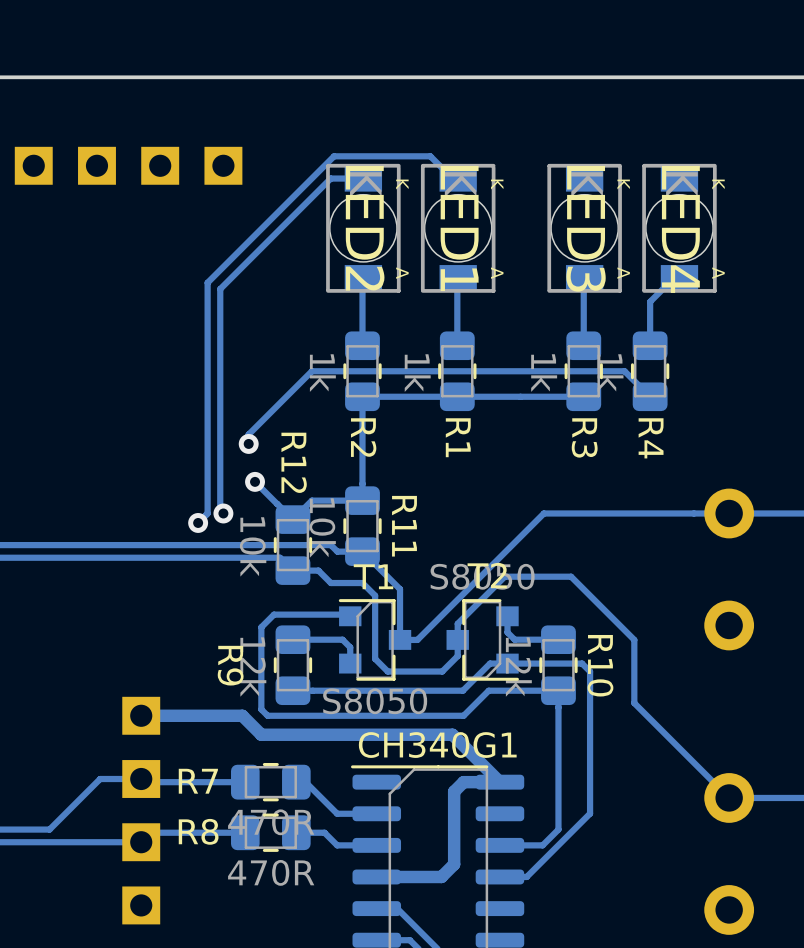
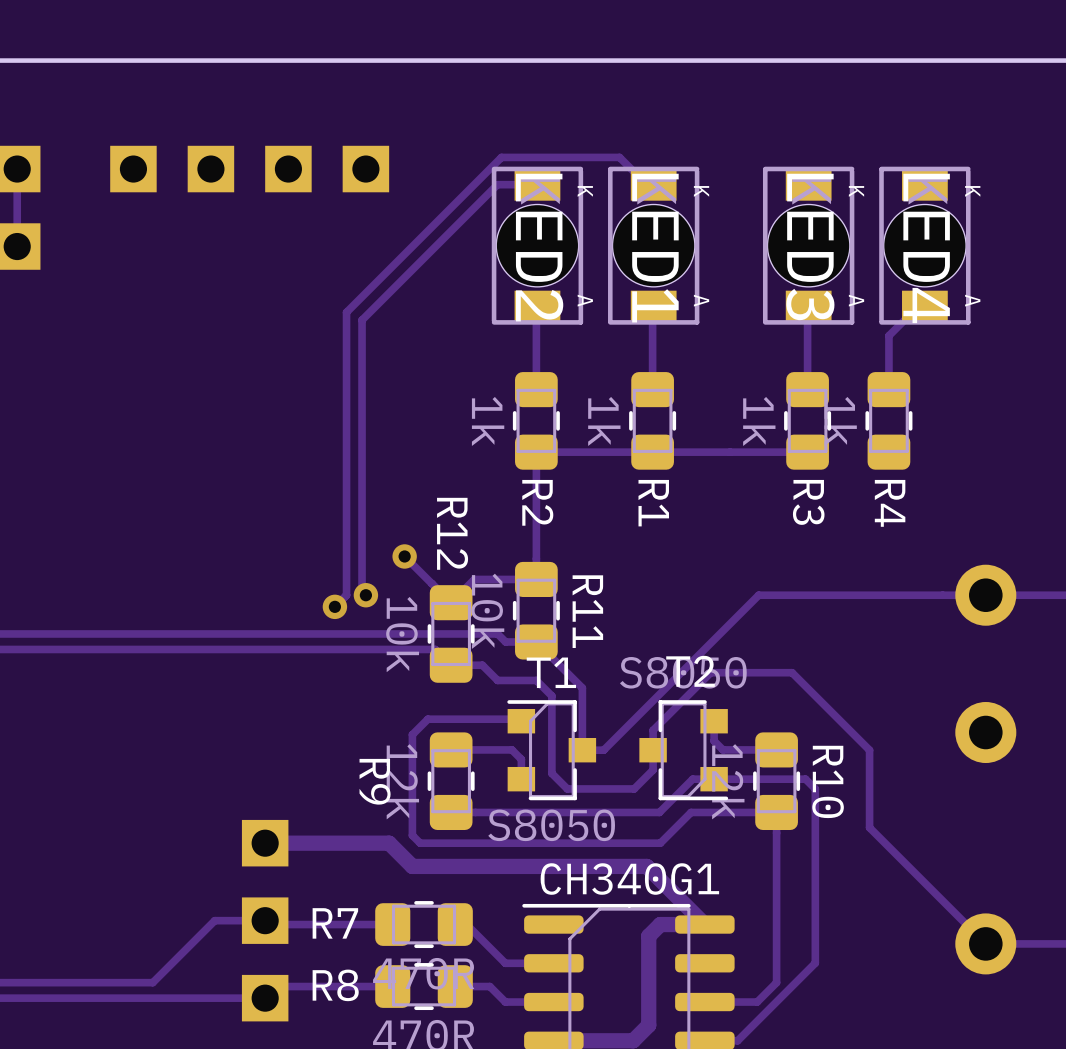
track: (650, 396) (624, 371) (311, 371) (248, 434) (248, 443) -> none
via: (248, 443) -> none

